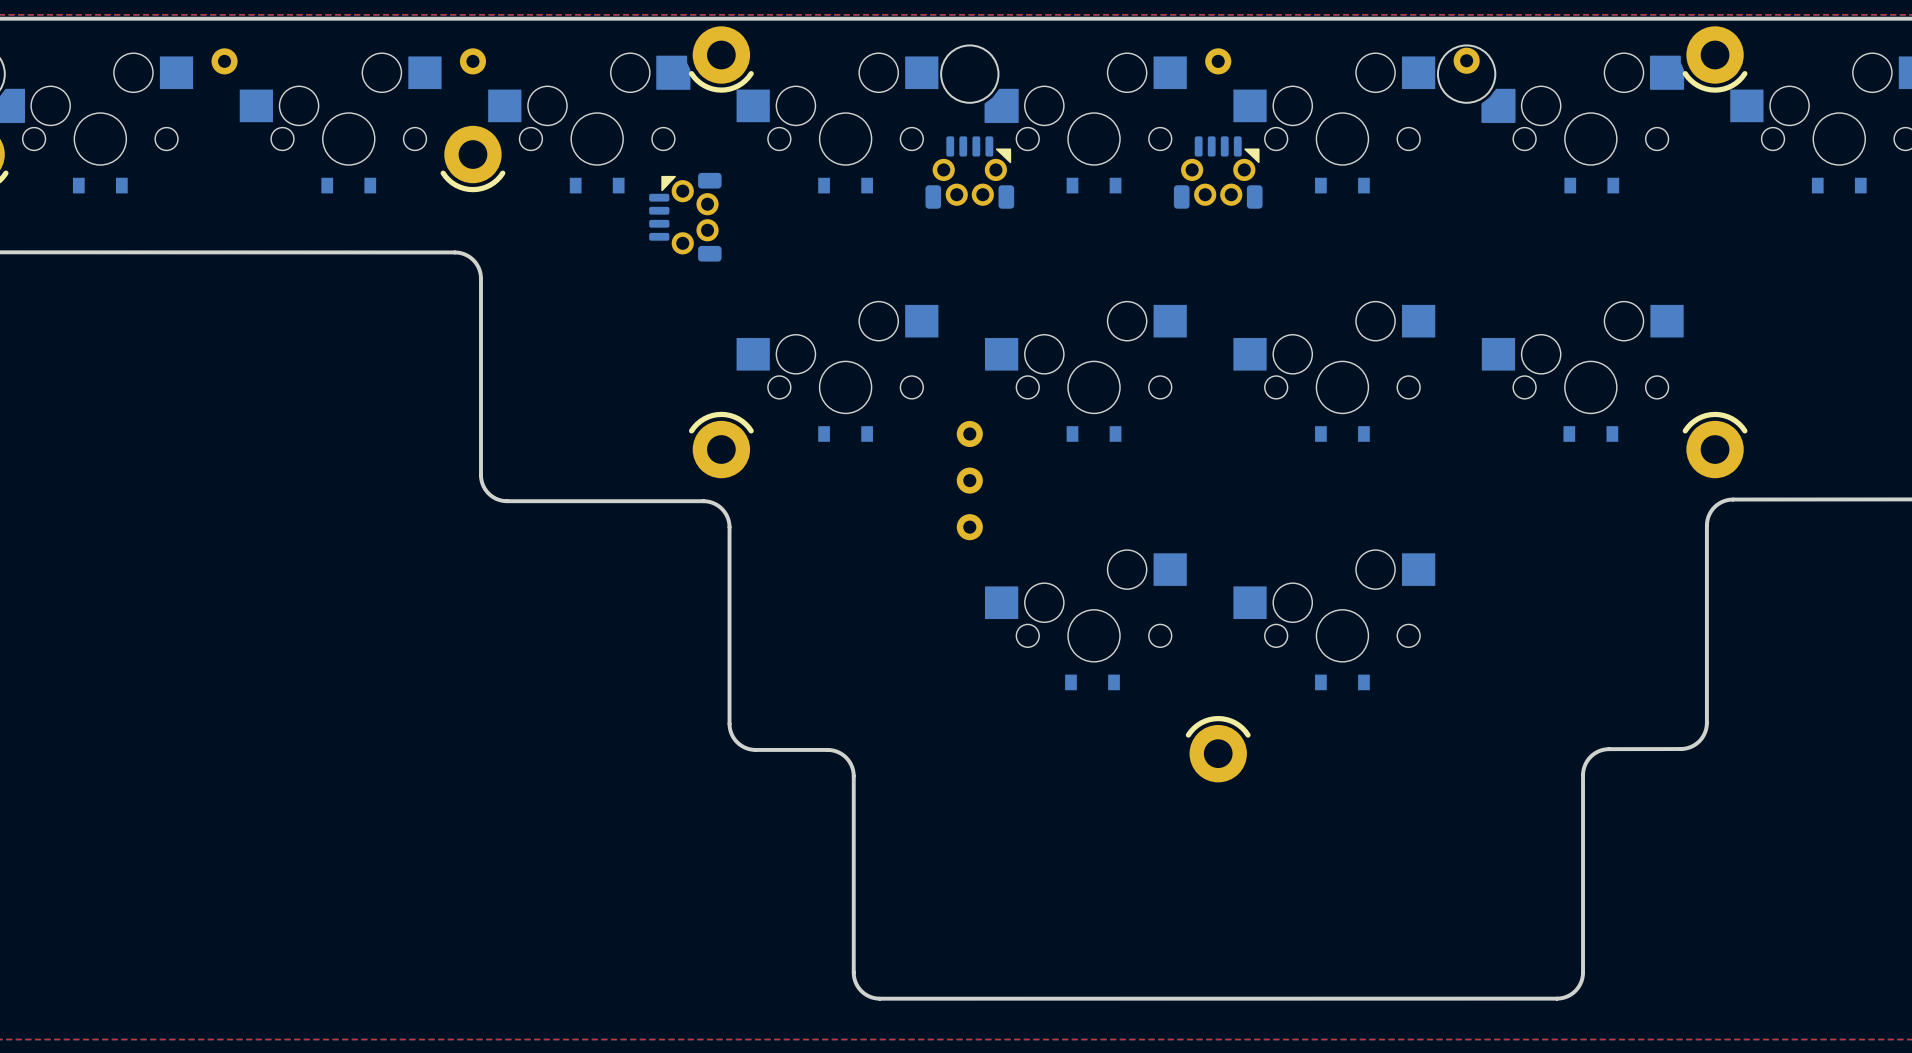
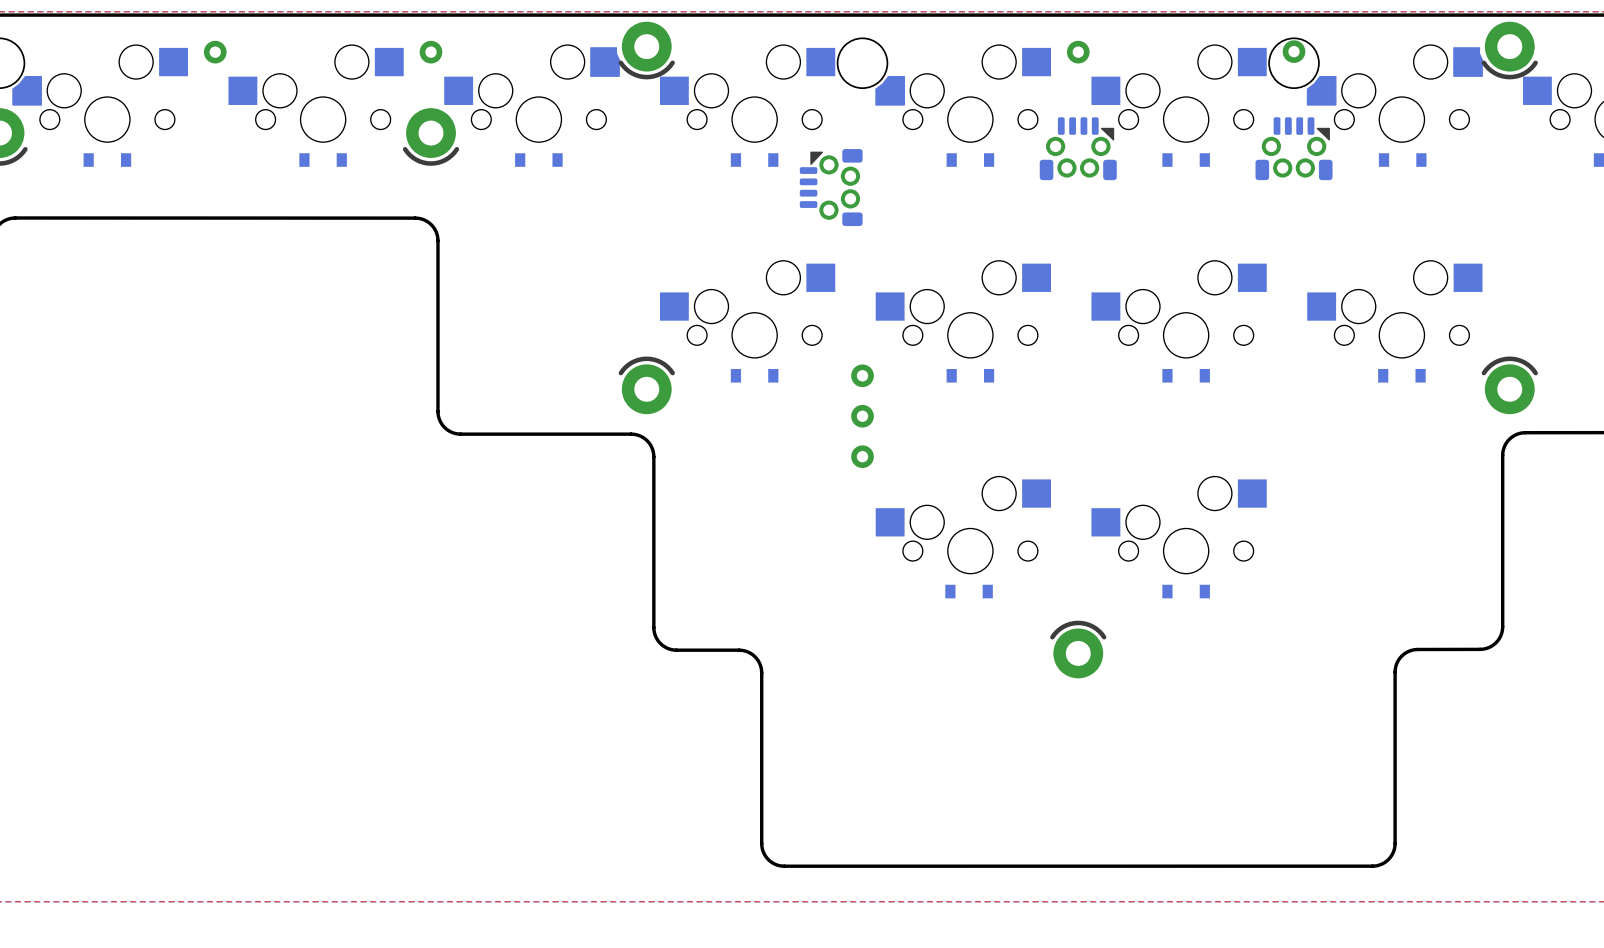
part rotation: 0° (969, 172) -> 90° counterclockwise (831, 187)
part position: (969, 172) -> (831, 187)
part: none -> (1294, 148)
part: (685, 217) -> none

